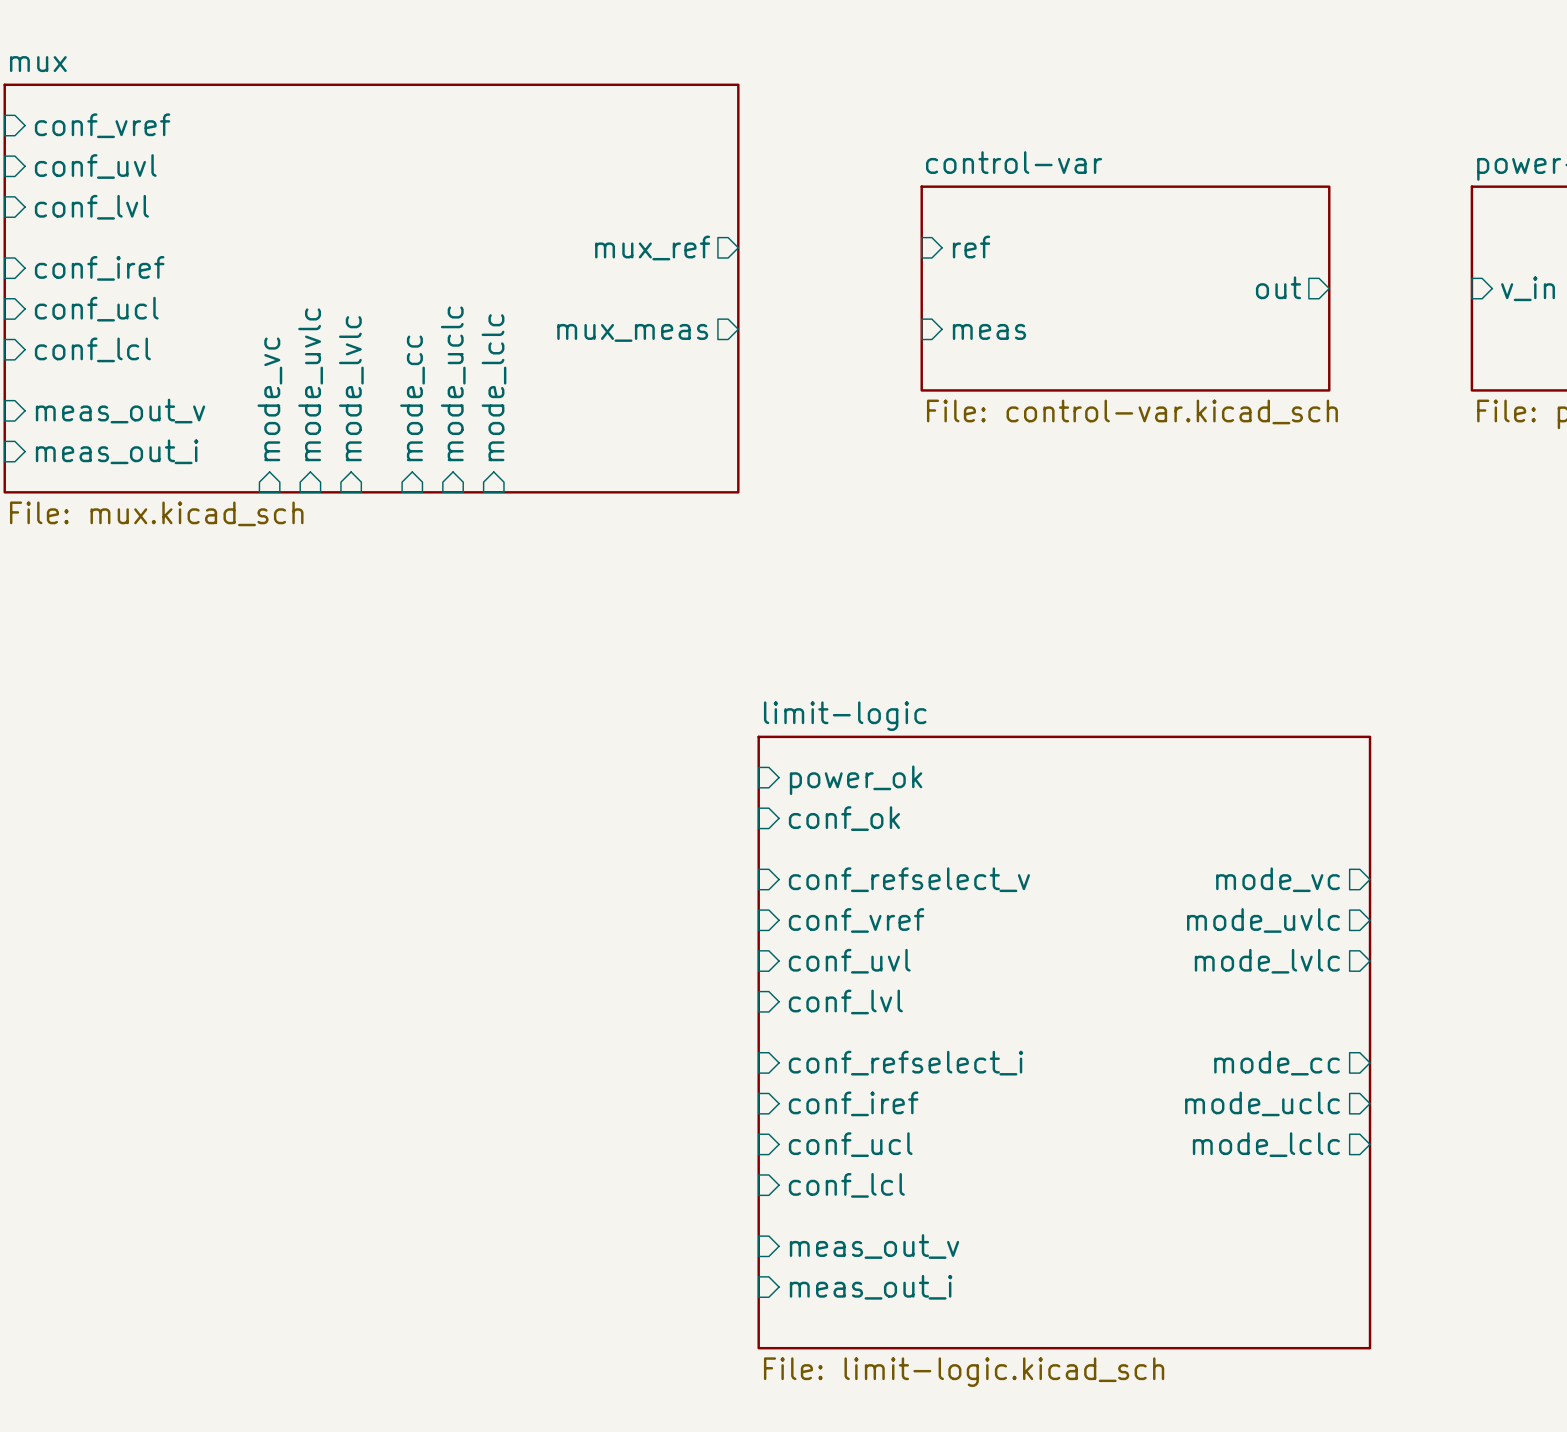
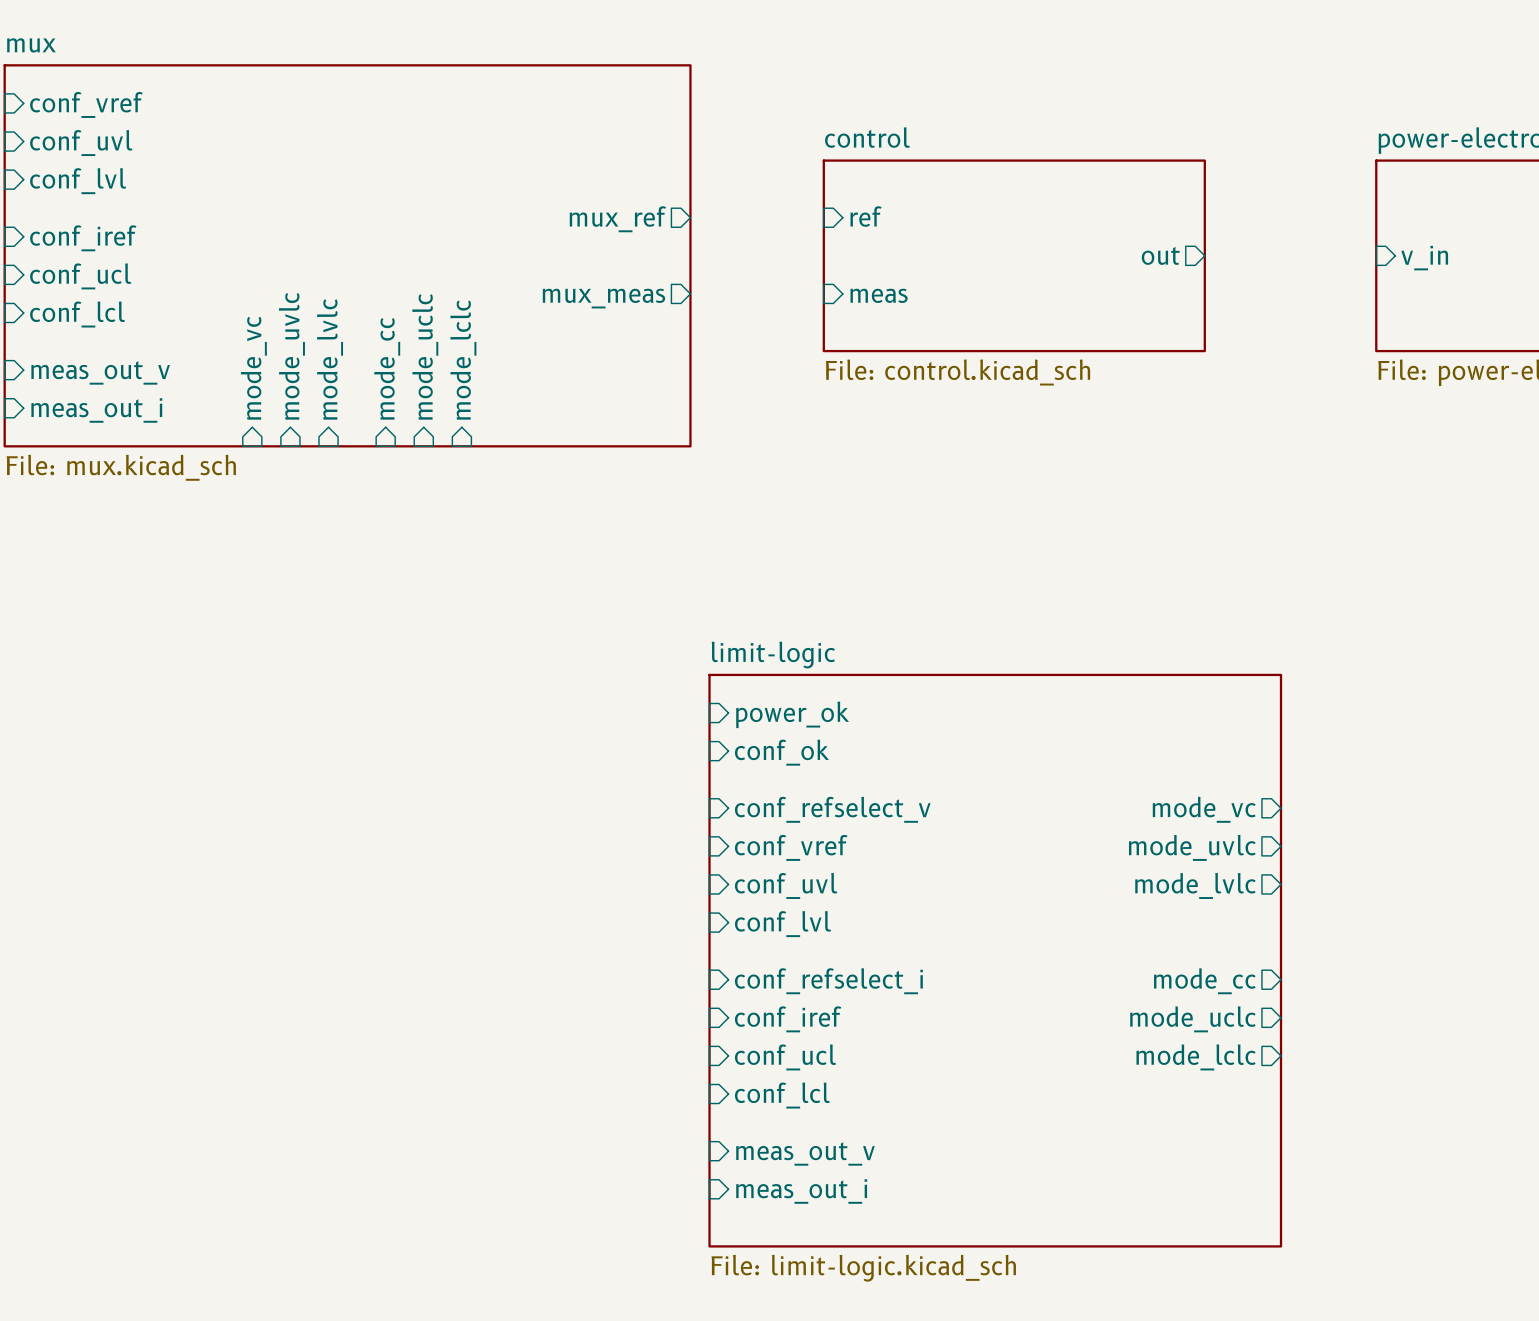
sheet pin position: ref (971, 247) -> ref (866, 216)
sheet pin position: out (1278, 287) -> out (1160, 255)
sheet control: none -> File: control.kicad_sch (1014, 255)
sheet control-var: File: control-var.kicad_sch (1125, 288) -> none
sheet pin position: meas (989, 331) -> meas (879, 295)

